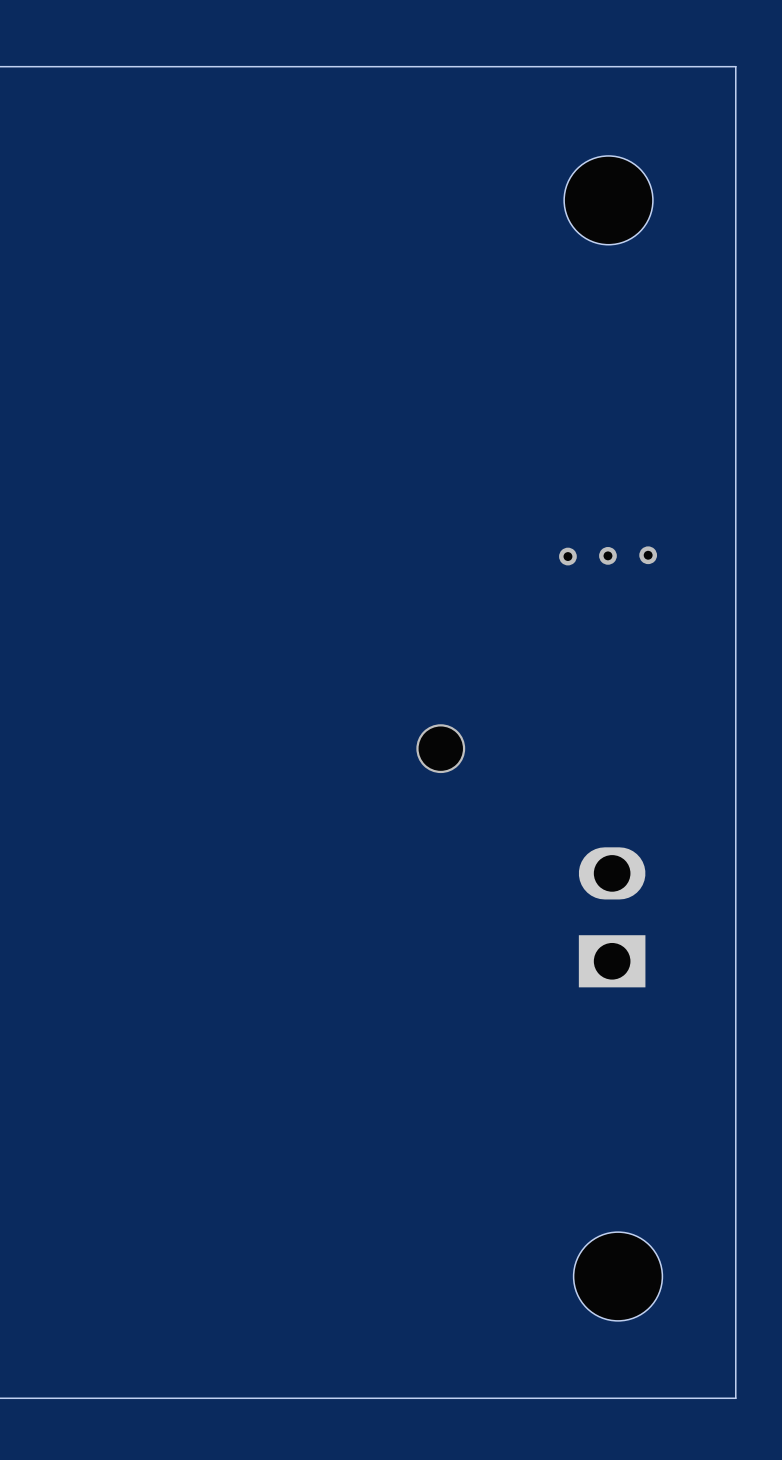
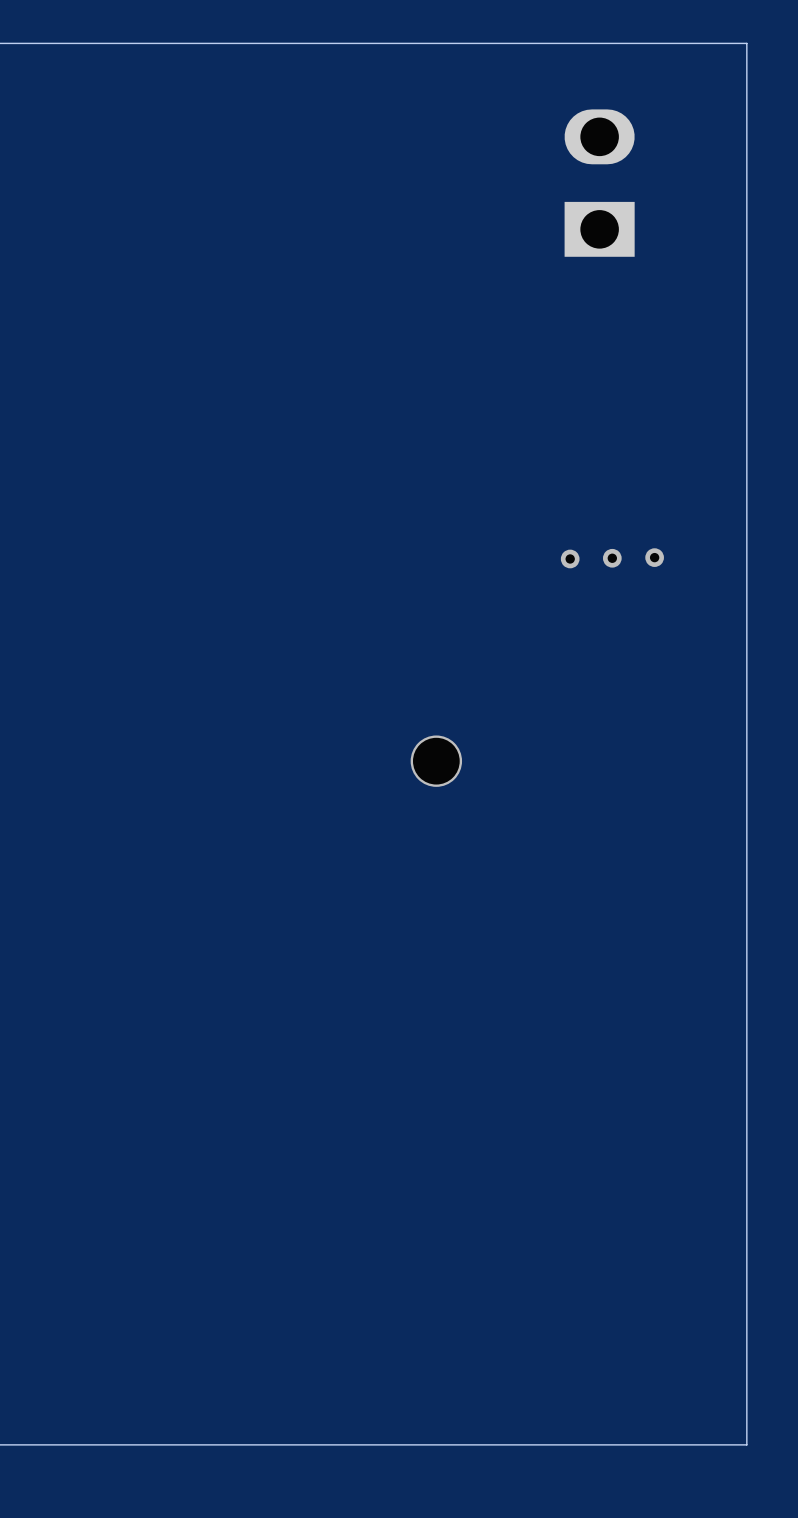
part footprint: [564, 155, 653, 245] -> [564, 109, 635, 257]
part: (612, 917) -> none
part: (618, 1276) -> none

